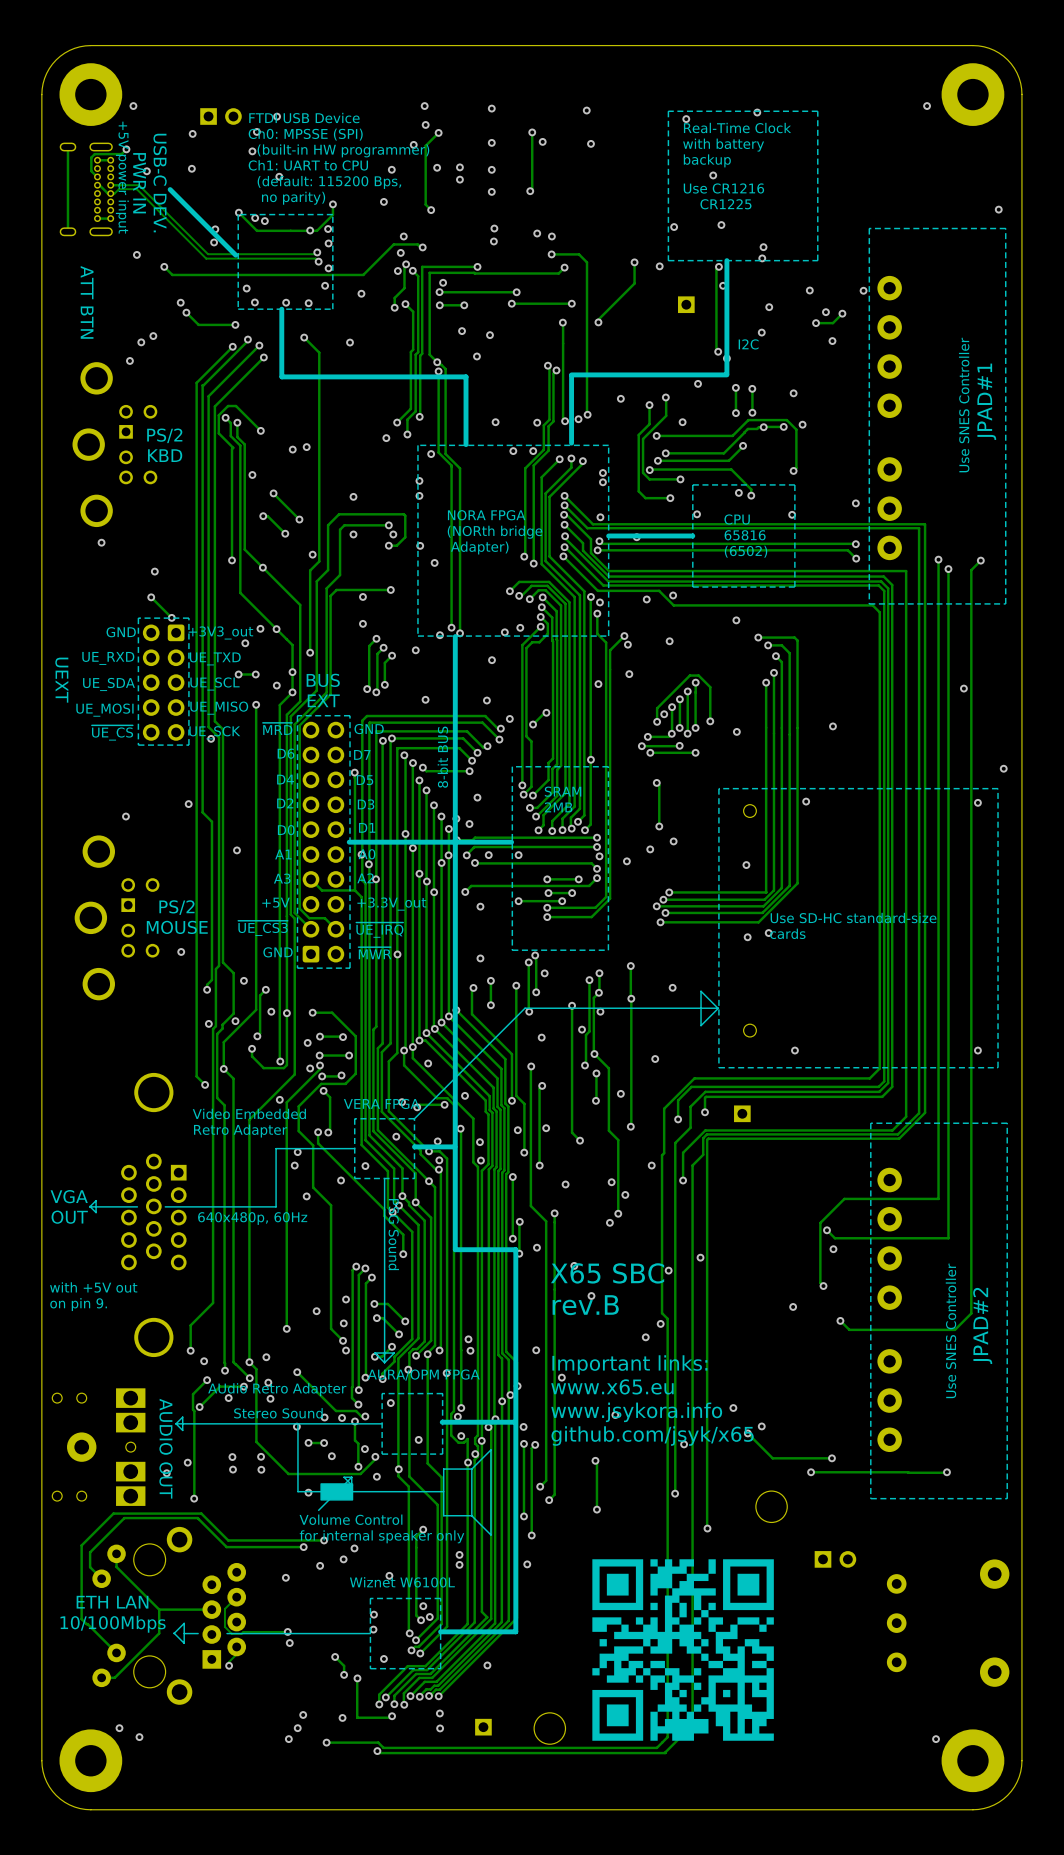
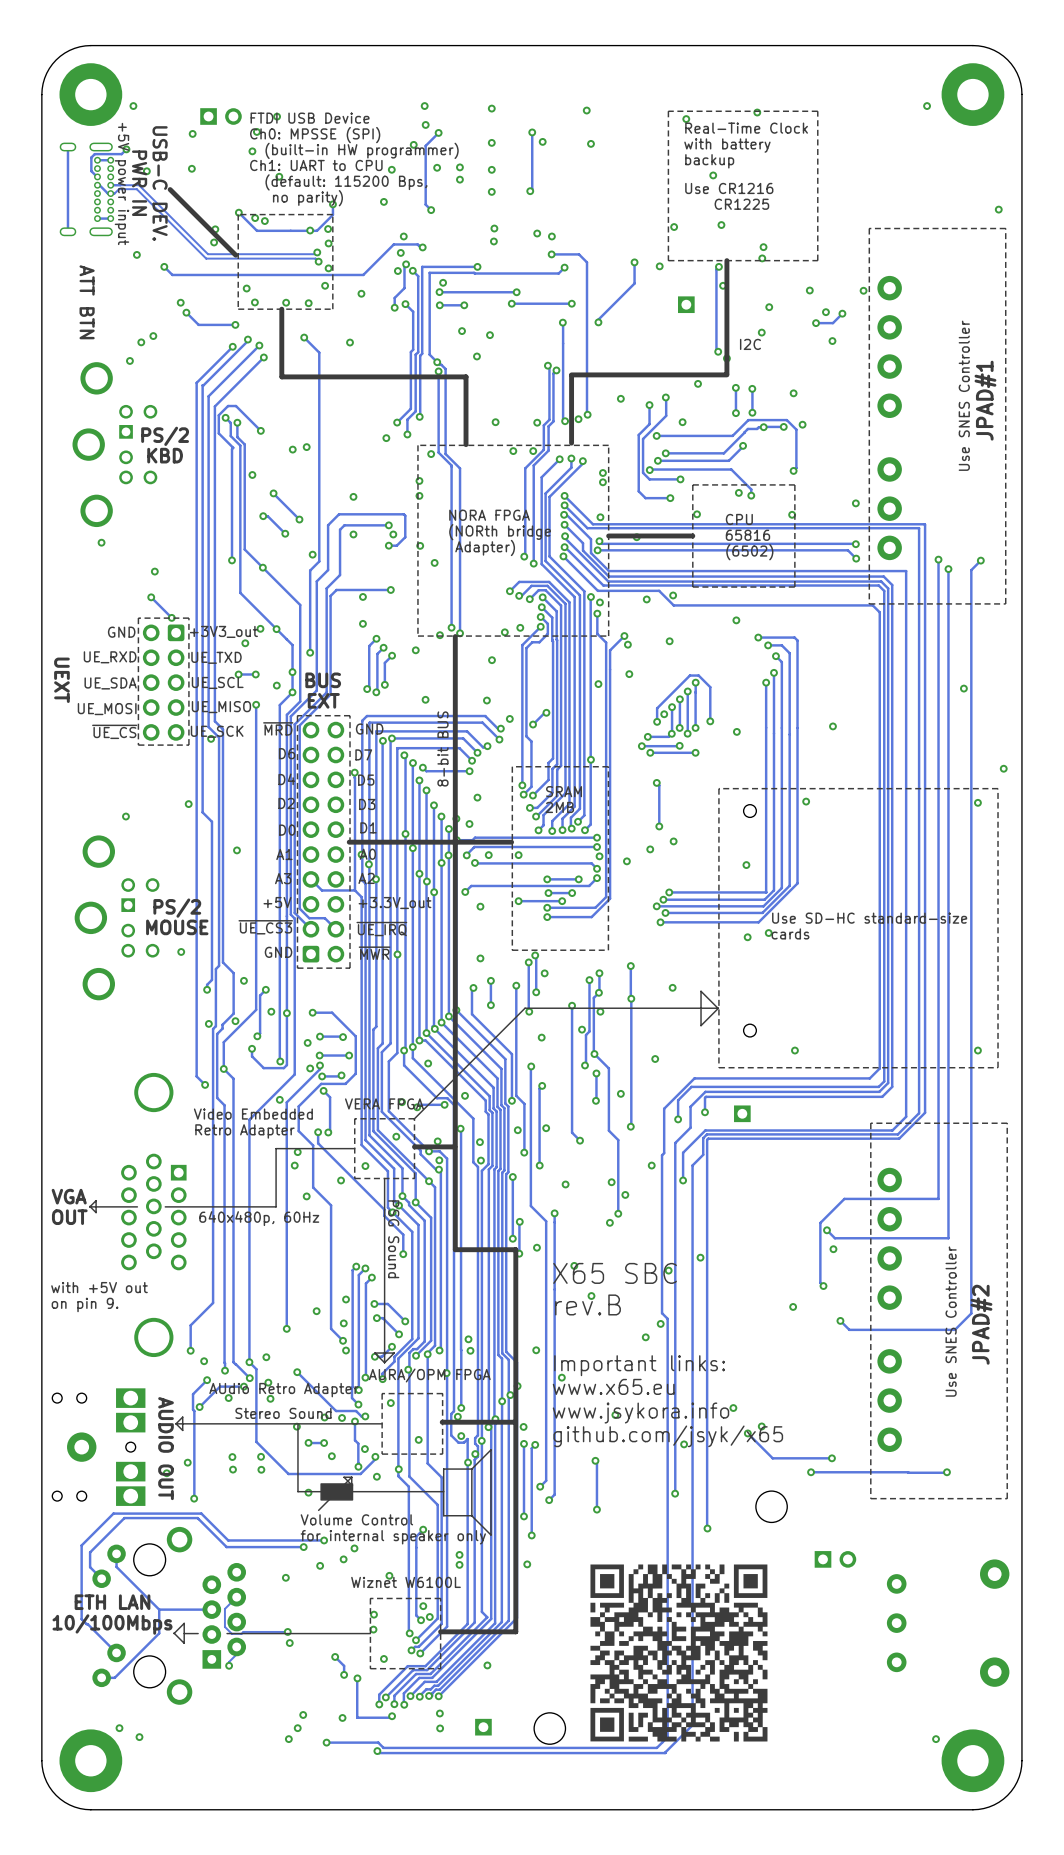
drawing shape: [592, 1559, 774, 1741] -> [590, 1564, 768, 1742]

